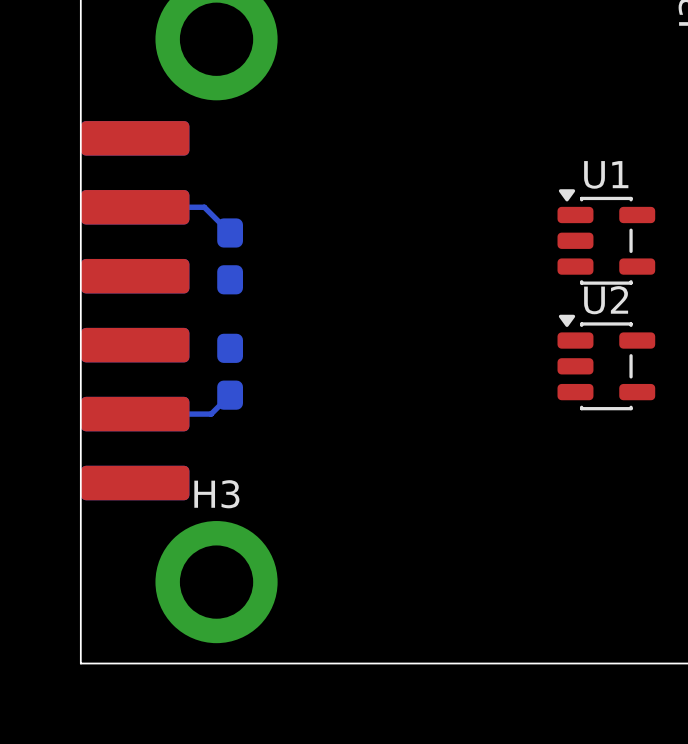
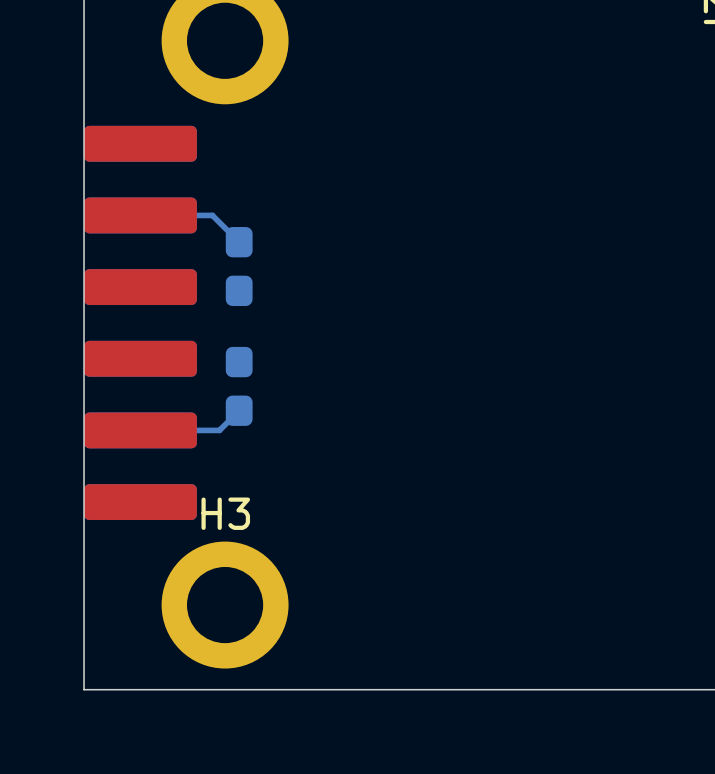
U1: (606, 236) -> none
U2: (606, 362) -> none

